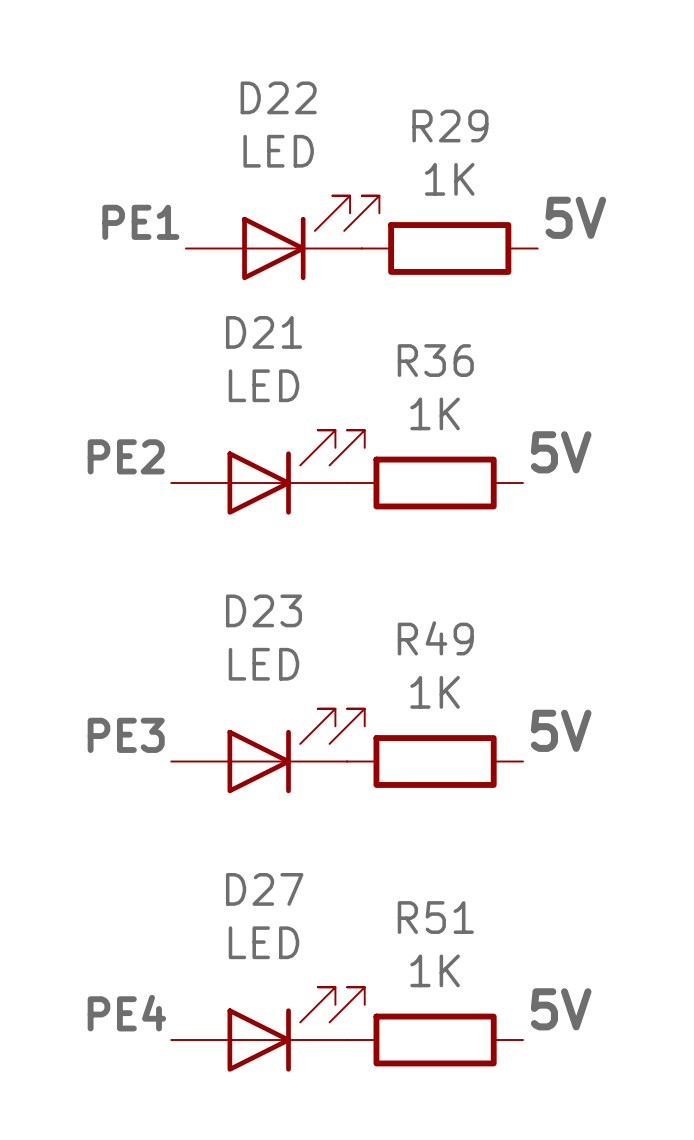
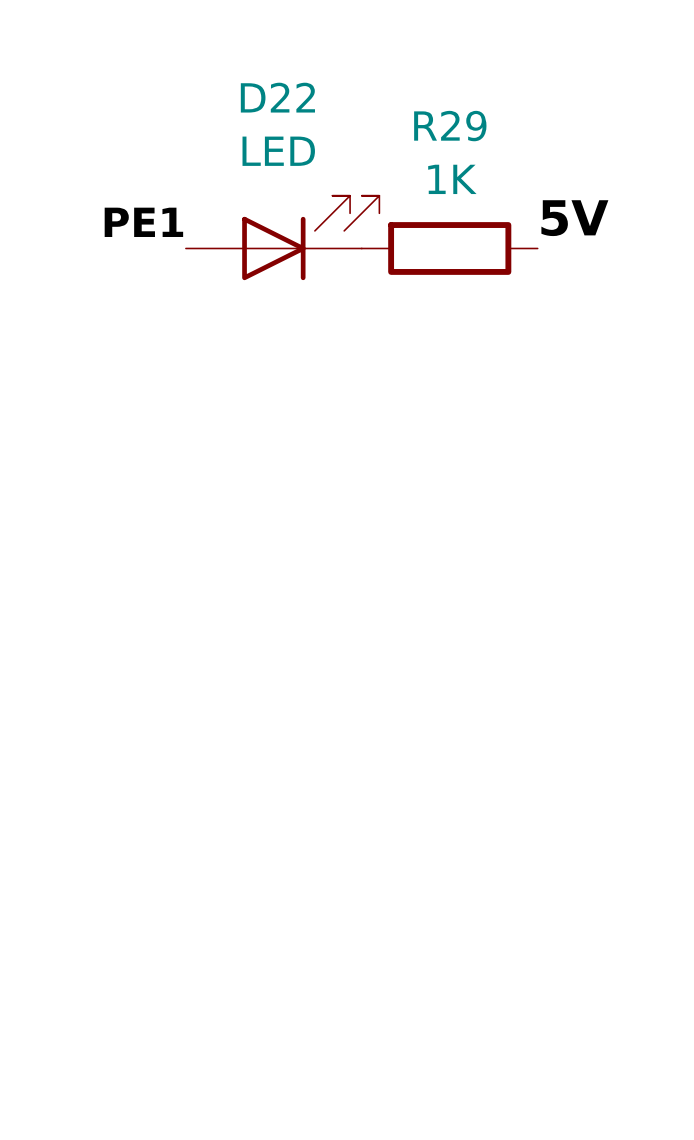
label: 5V (561, 452) -> none
label: PE2 (126, 456) -> none
D21: LED (267, 472) -> none
R36: 1K (435, 483) -> none
label: 5V (561, 730) -> none
label: PE3 (126, 735) -> none
D23: LED (267, 750) -> none
R49: 1K (435, 761) -> none
label: 5V (561, 1009) -> none
label: PE4 (126, 1013) -> none
D27: LED (267, 1029) -> none
R51: 1K (435, 1040) -> none

